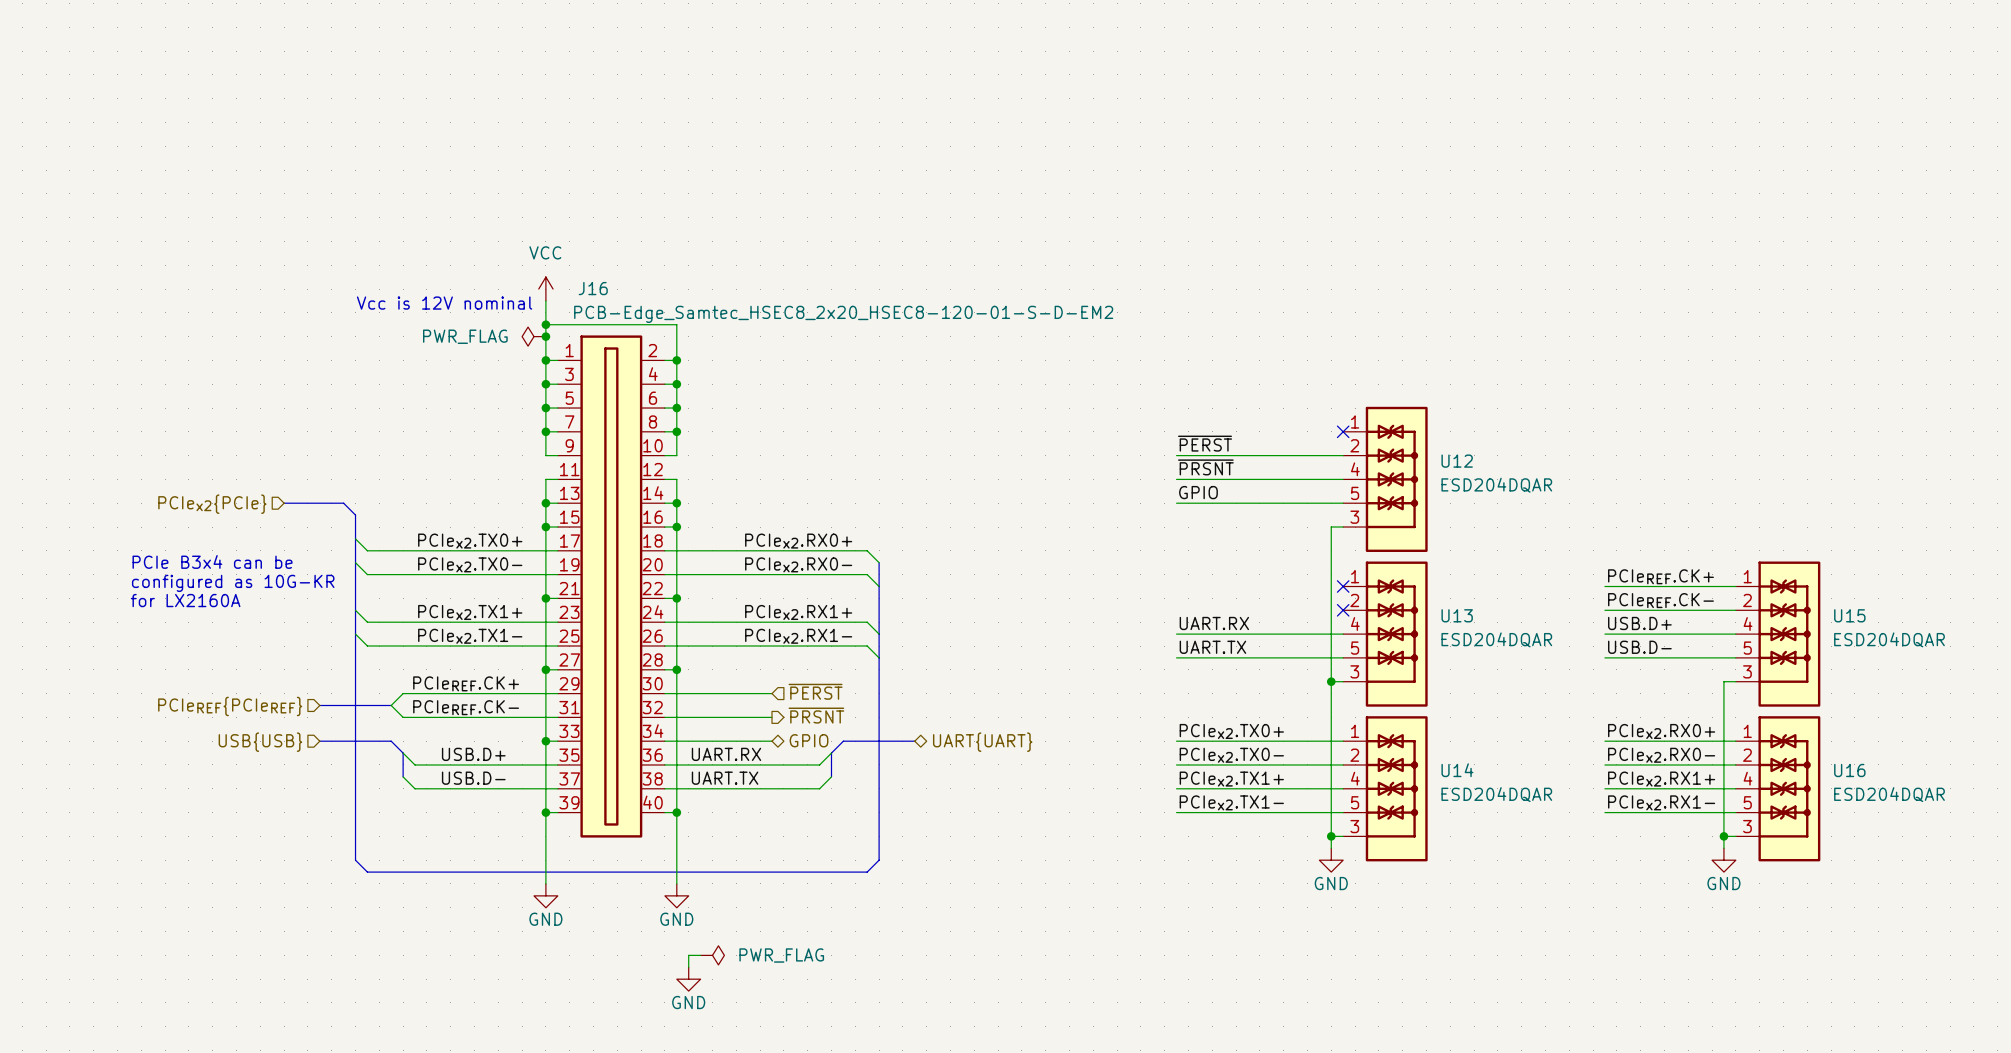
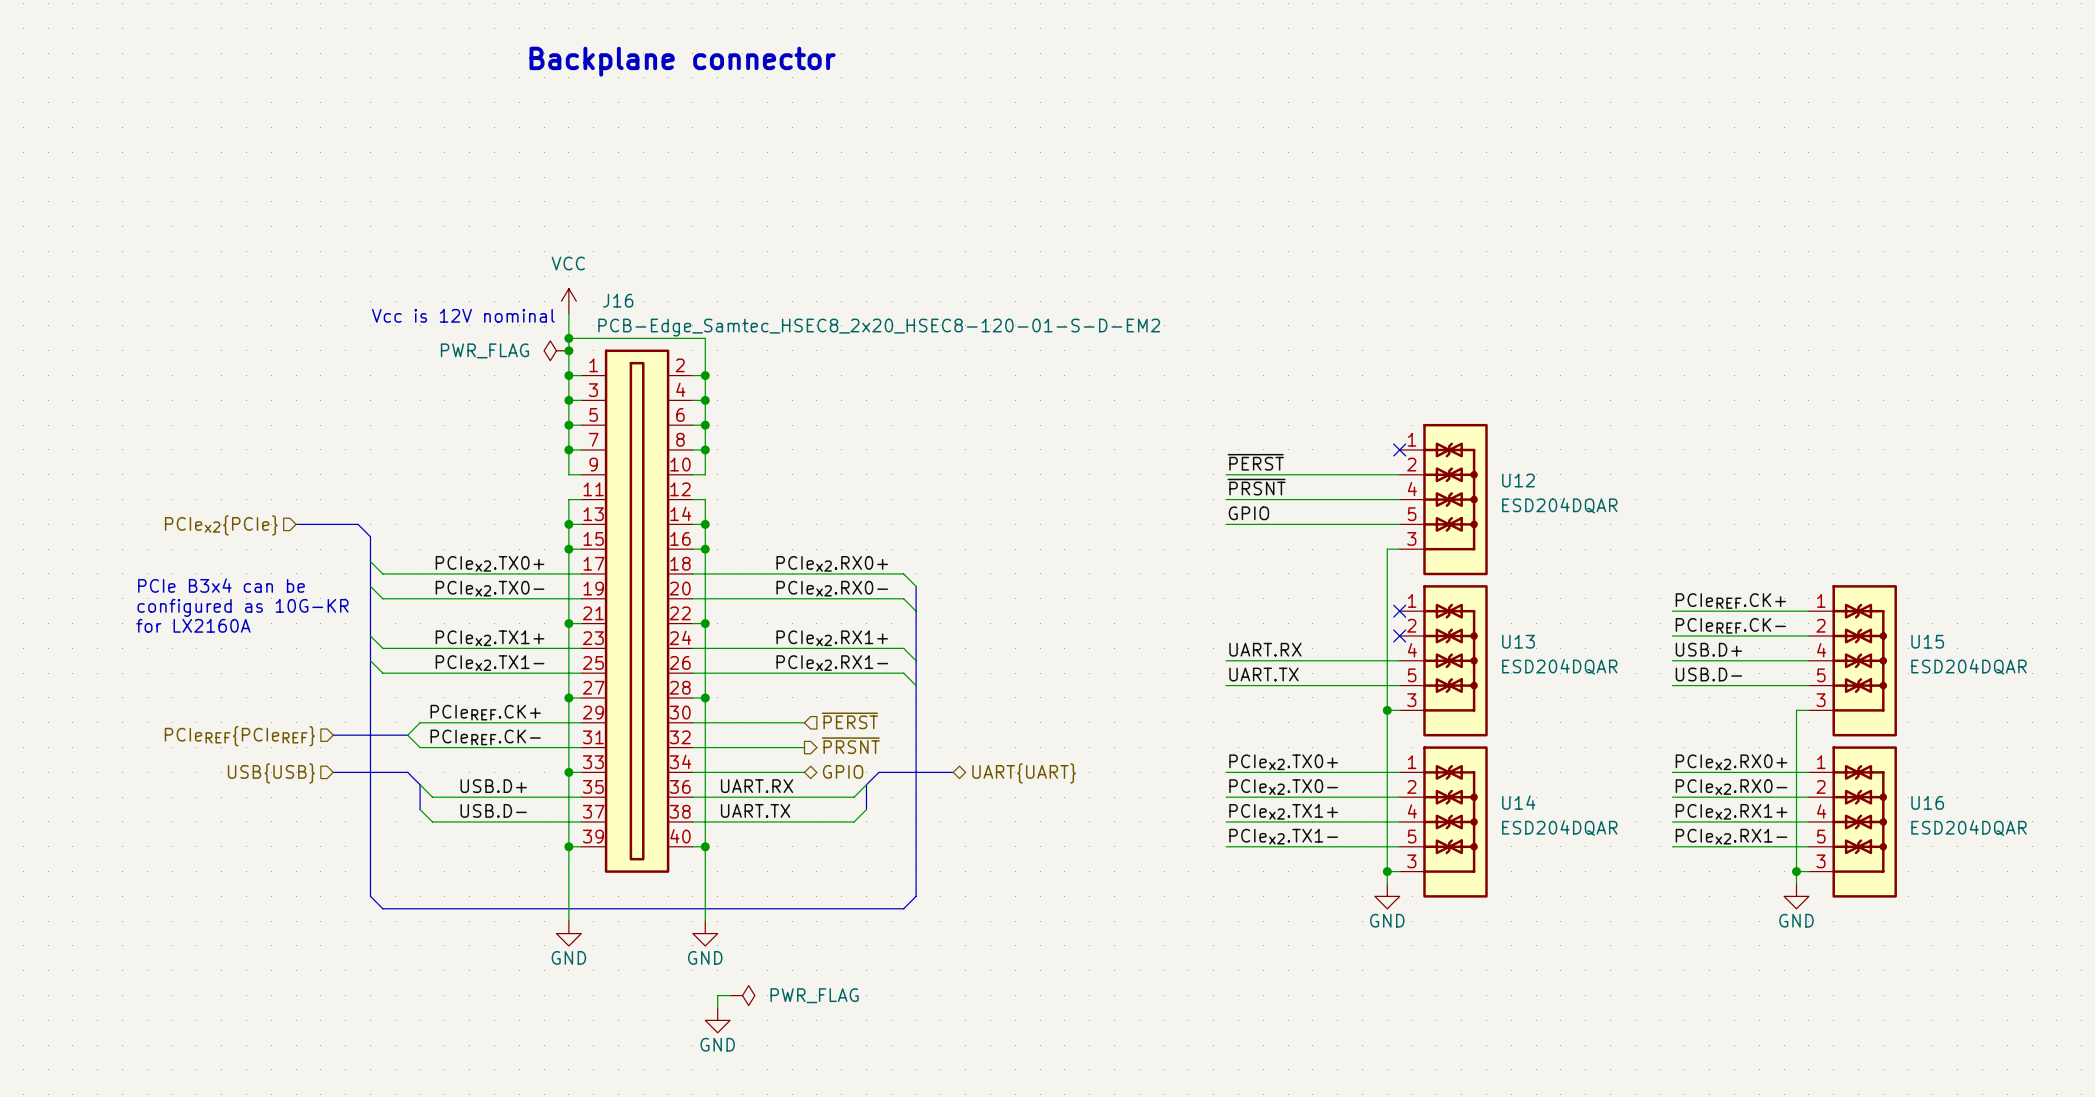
text: none -> Backplane connector (682, 61)

